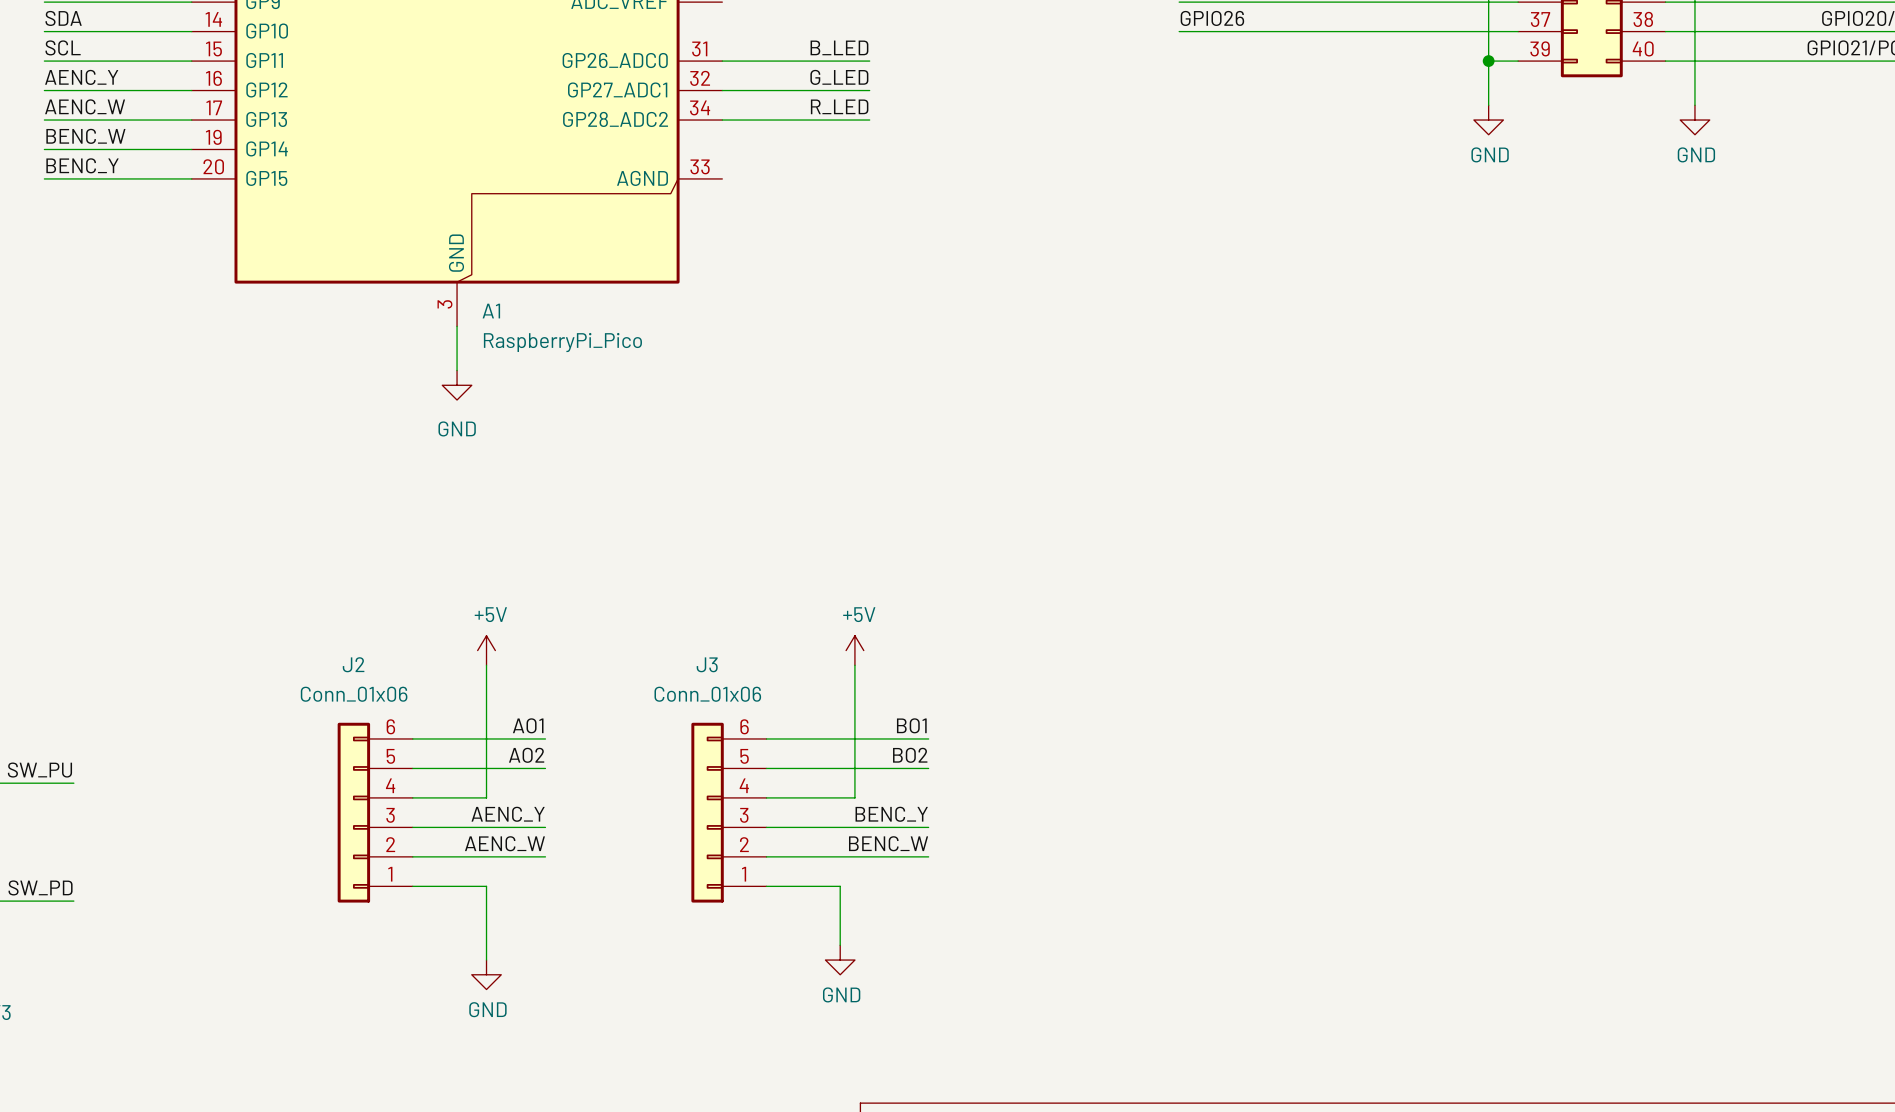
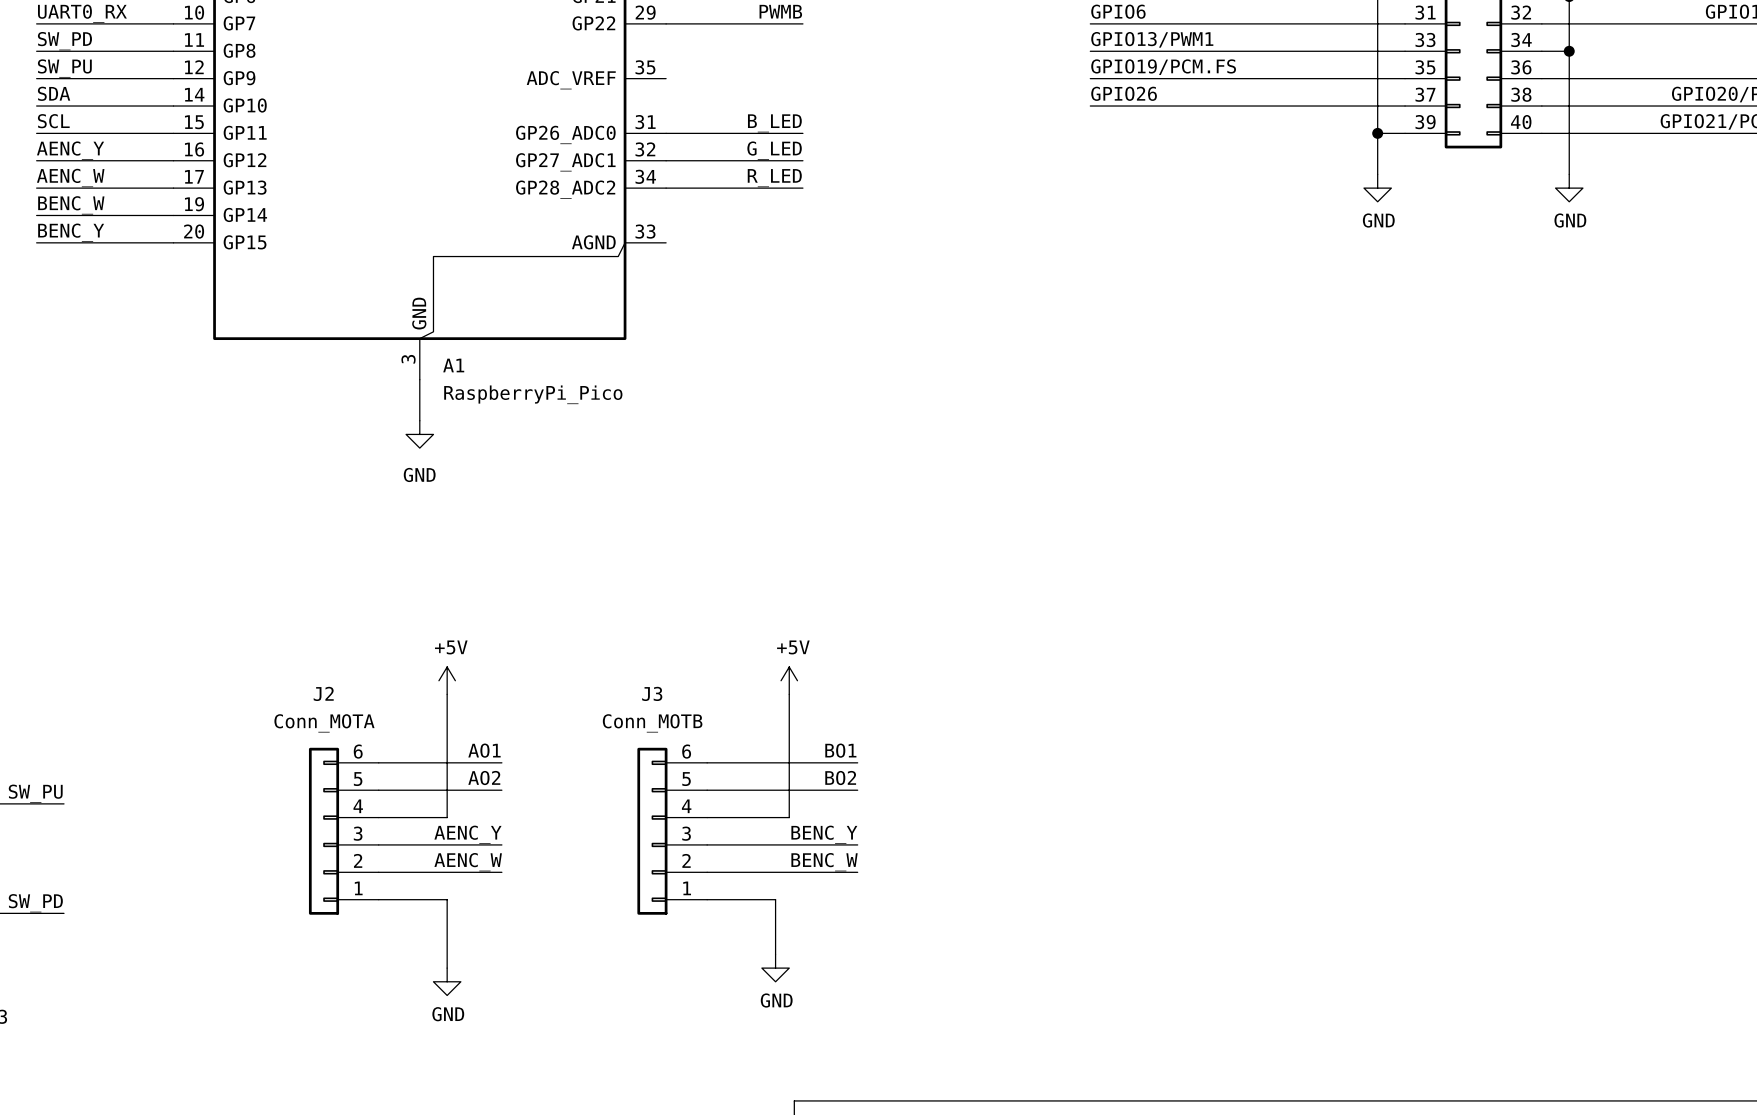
J2 value: Conn_01x06 (354, 694) -> Conn_MOTA (324, 723)
J3 value: Conn_01x06 (707, 694) -> Conn_MOTB (652, 723)

